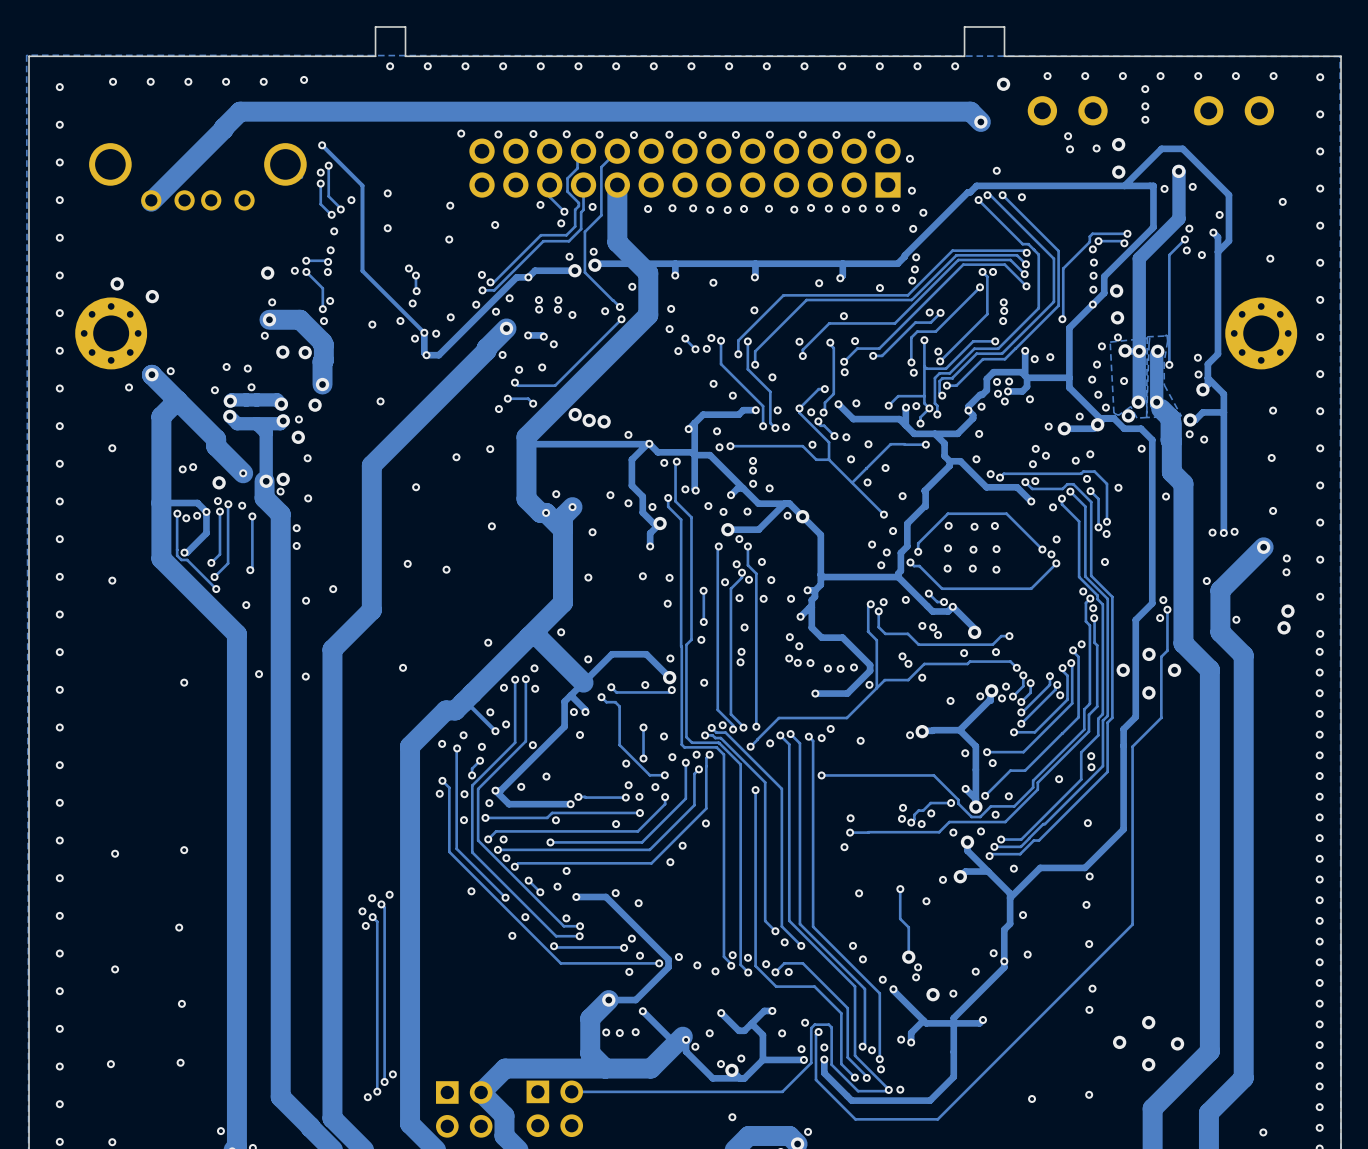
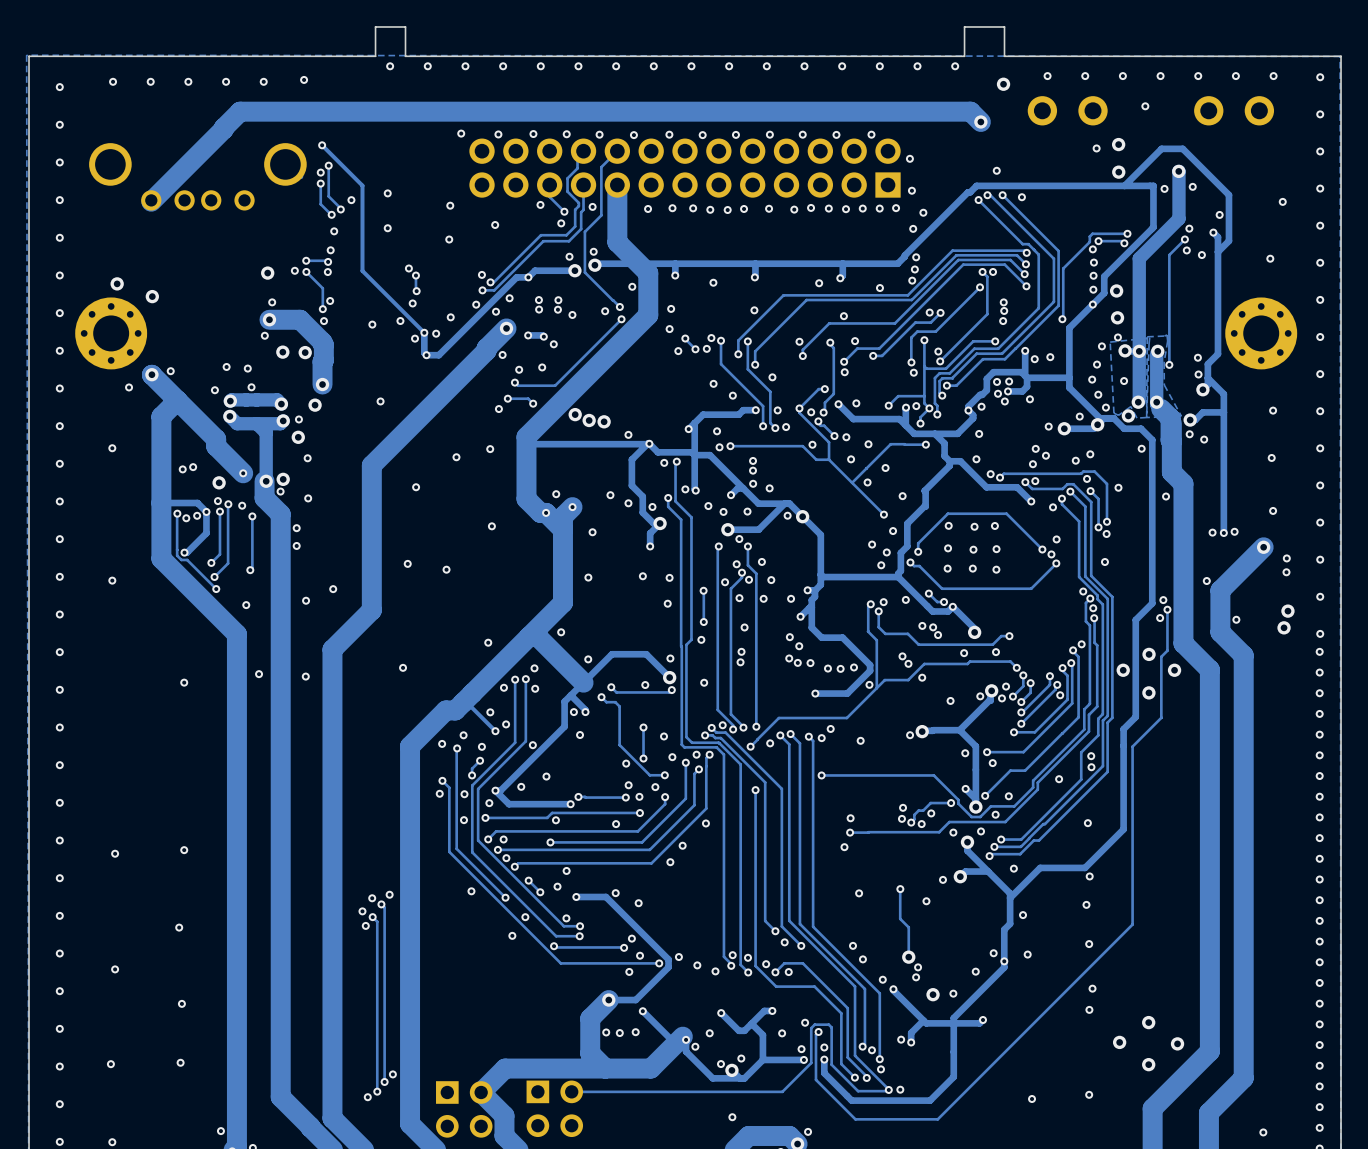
via: (1145, 89) -> none
via: (1145, 119) -> none
via: (1068, 136) -> none
via: (1070, 149) -> none

